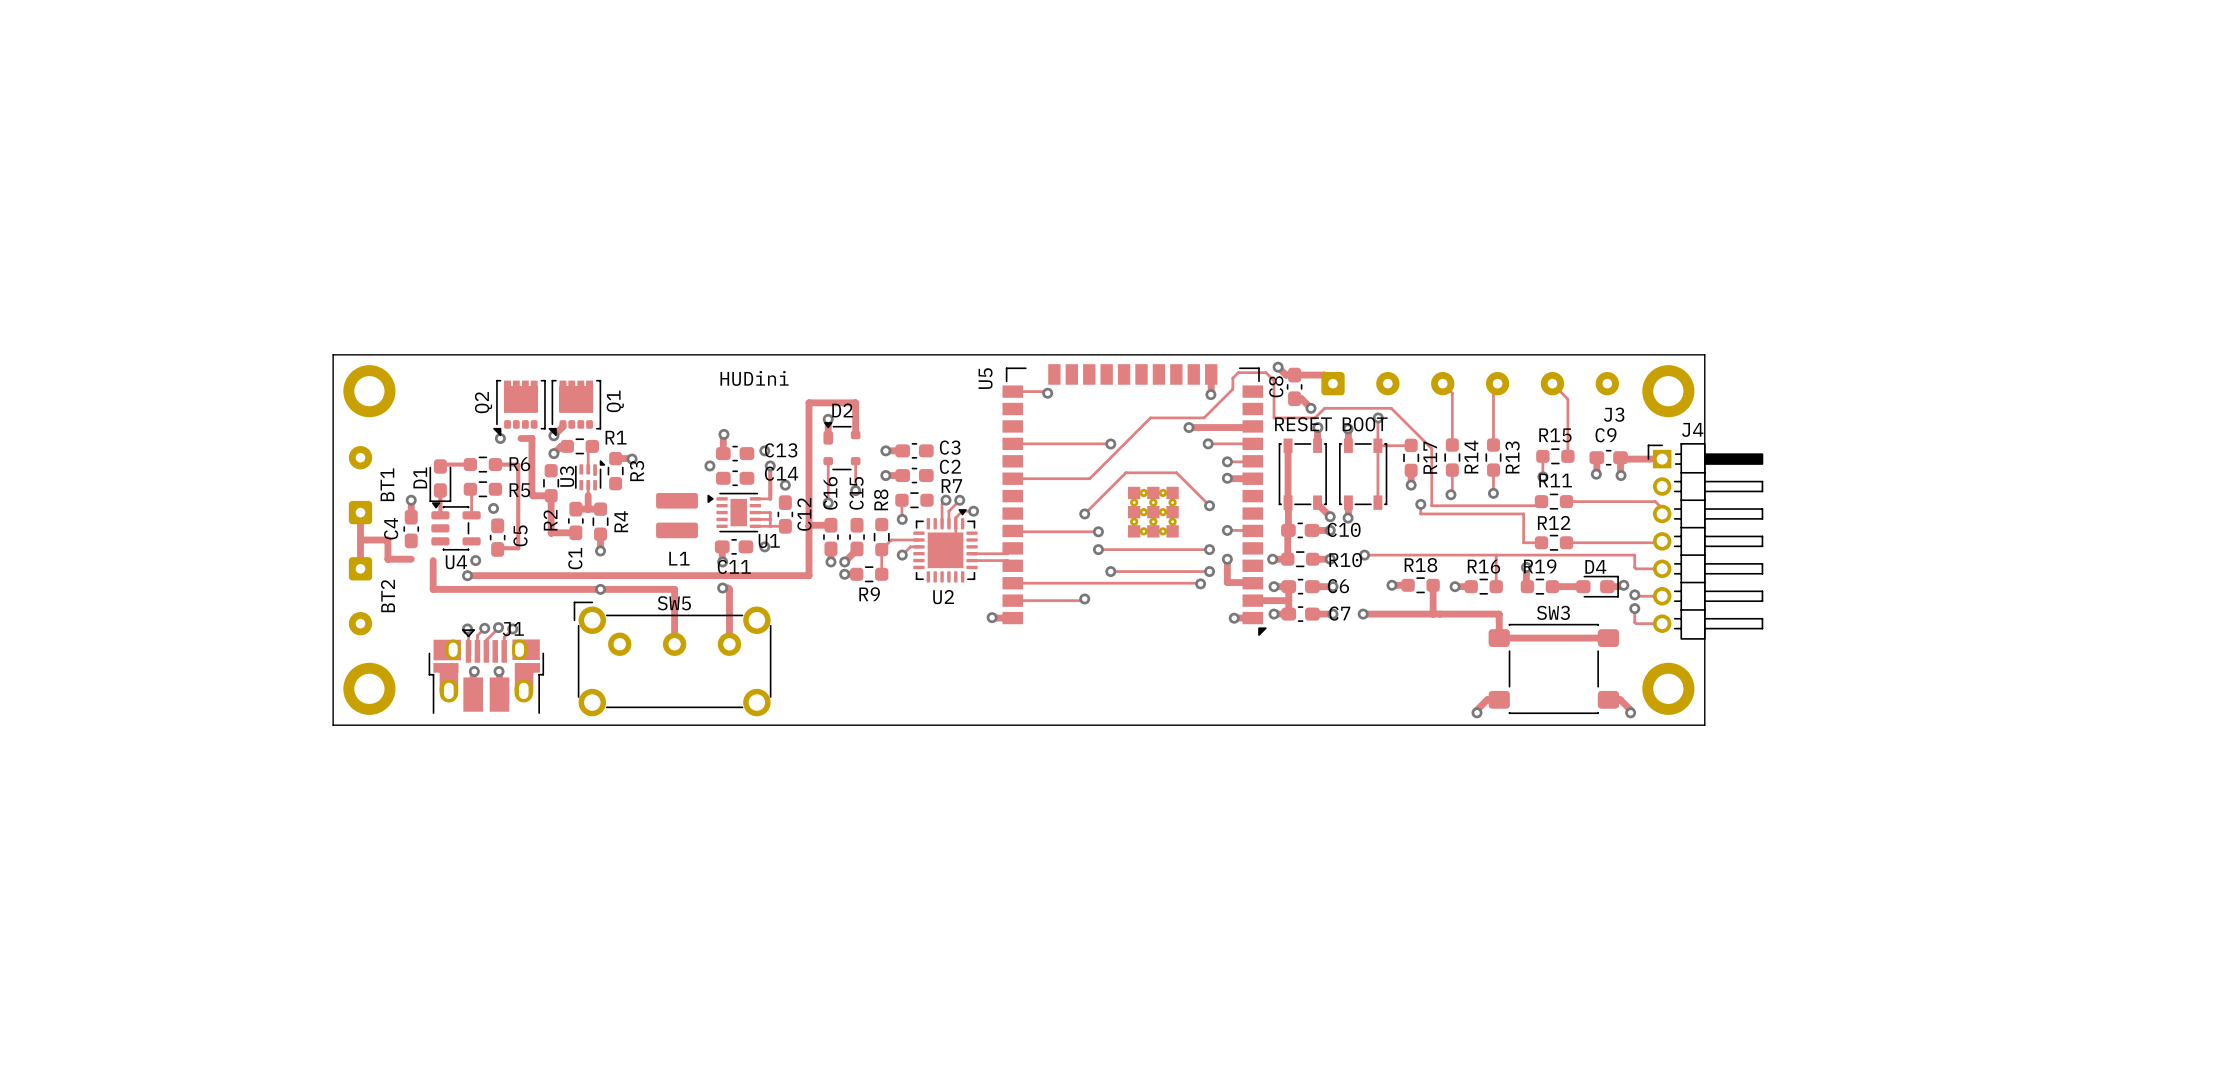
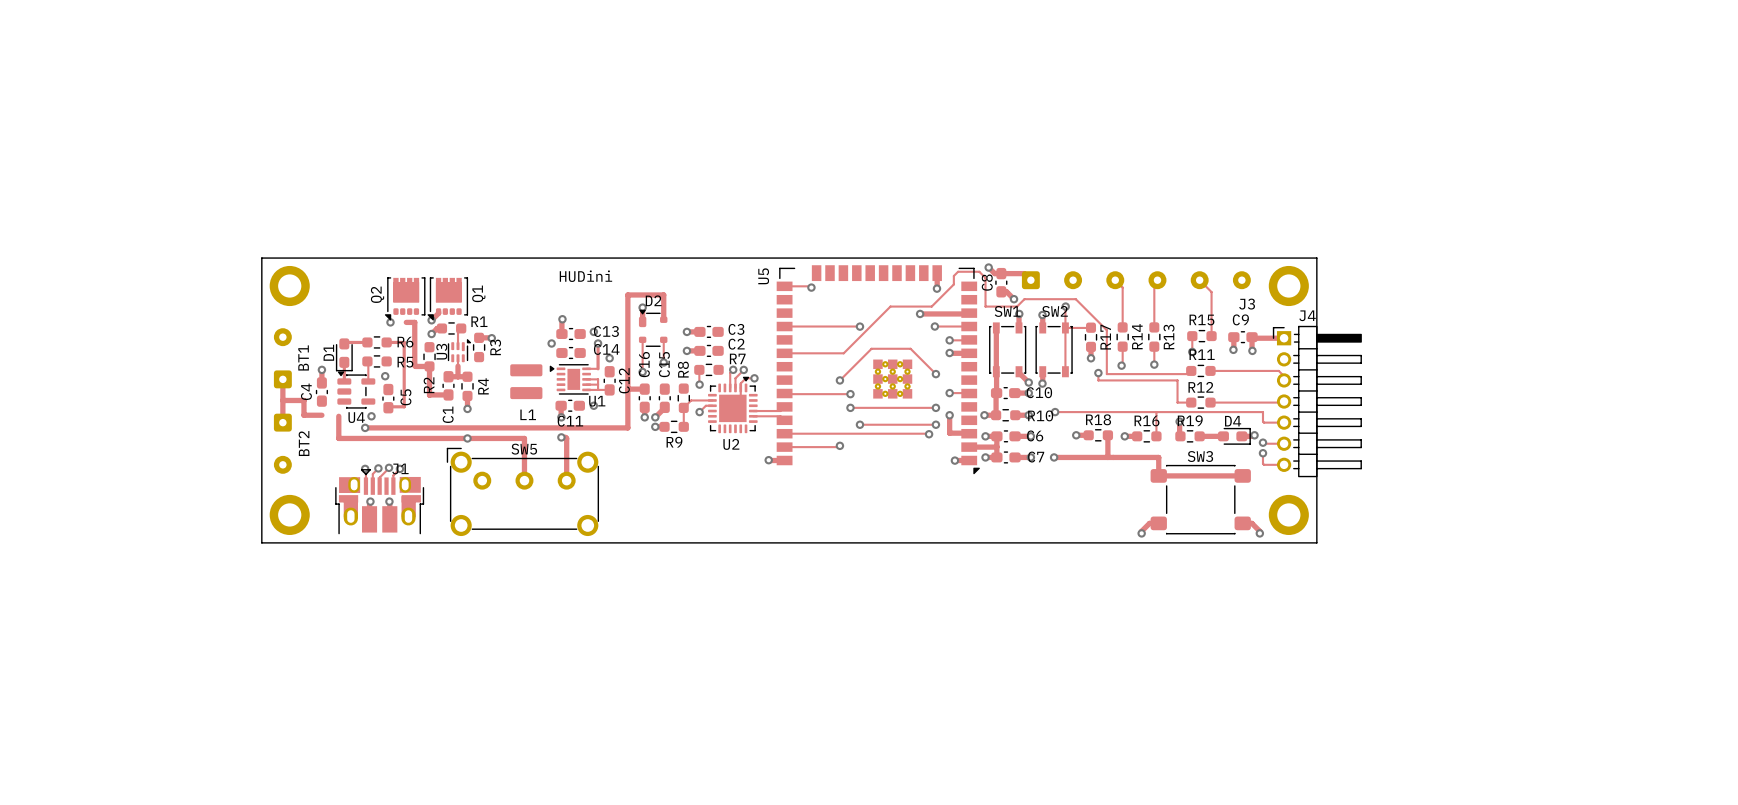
RESET name: RESET (1303, 424) -> SW1 (1007, 311)
BOOT name: BOOT (1365, 424) -> SW2 (1055, 311)

